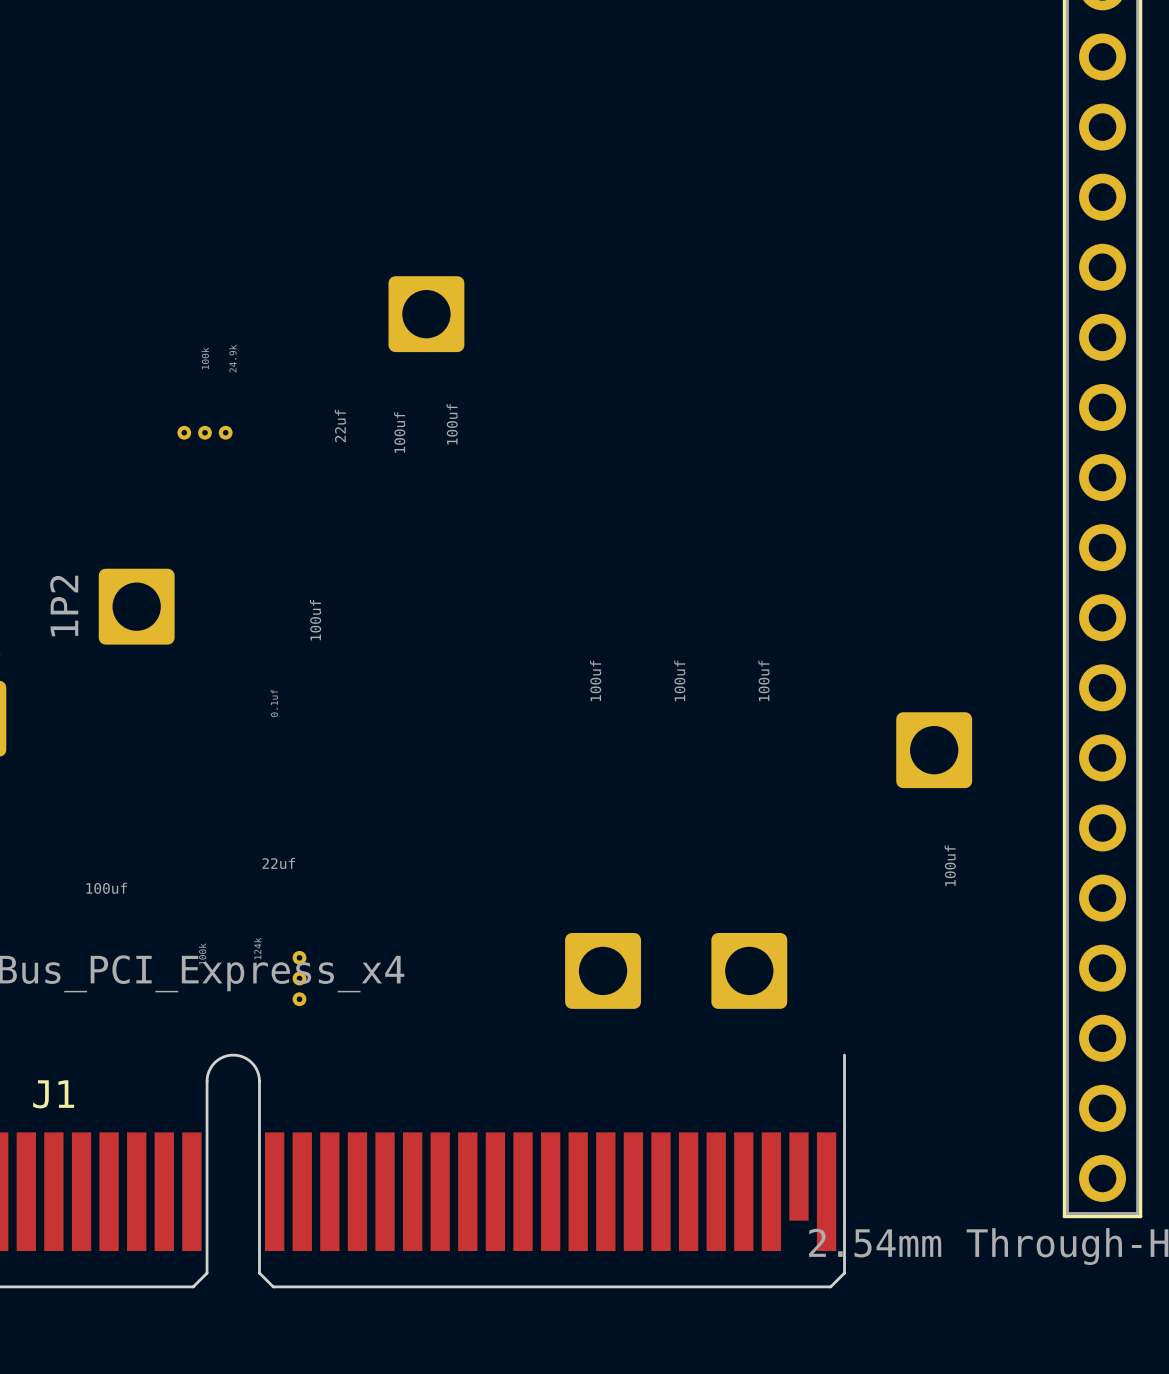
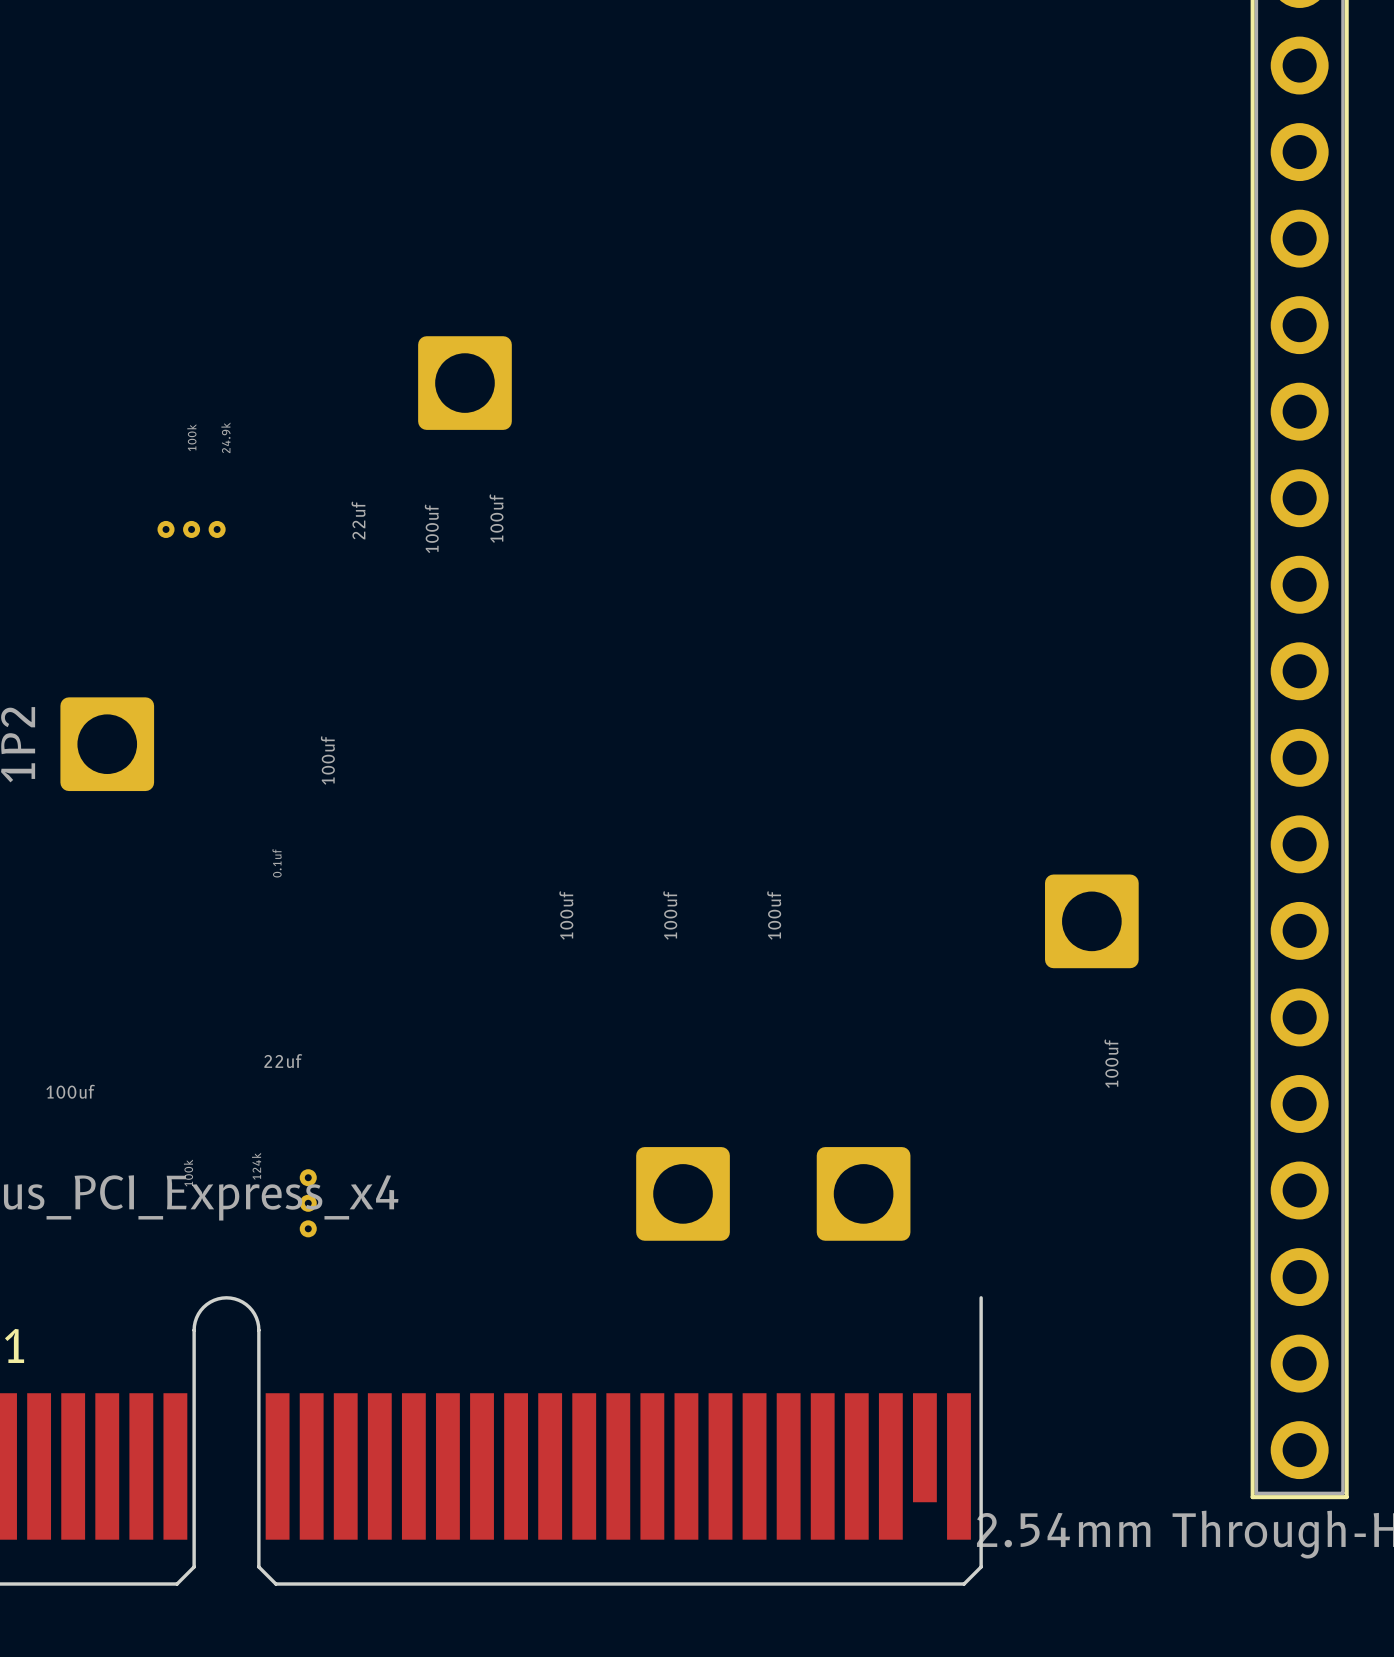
part: 100uf (595, 680) -> none
part: 100uf (679, 680) -> none
part: 100uf (763, 680) -> none
part: none -> 100uf (566, 915)
part: none -> 100uf (670, 915)
part: none -> 100uf (774, 915)

